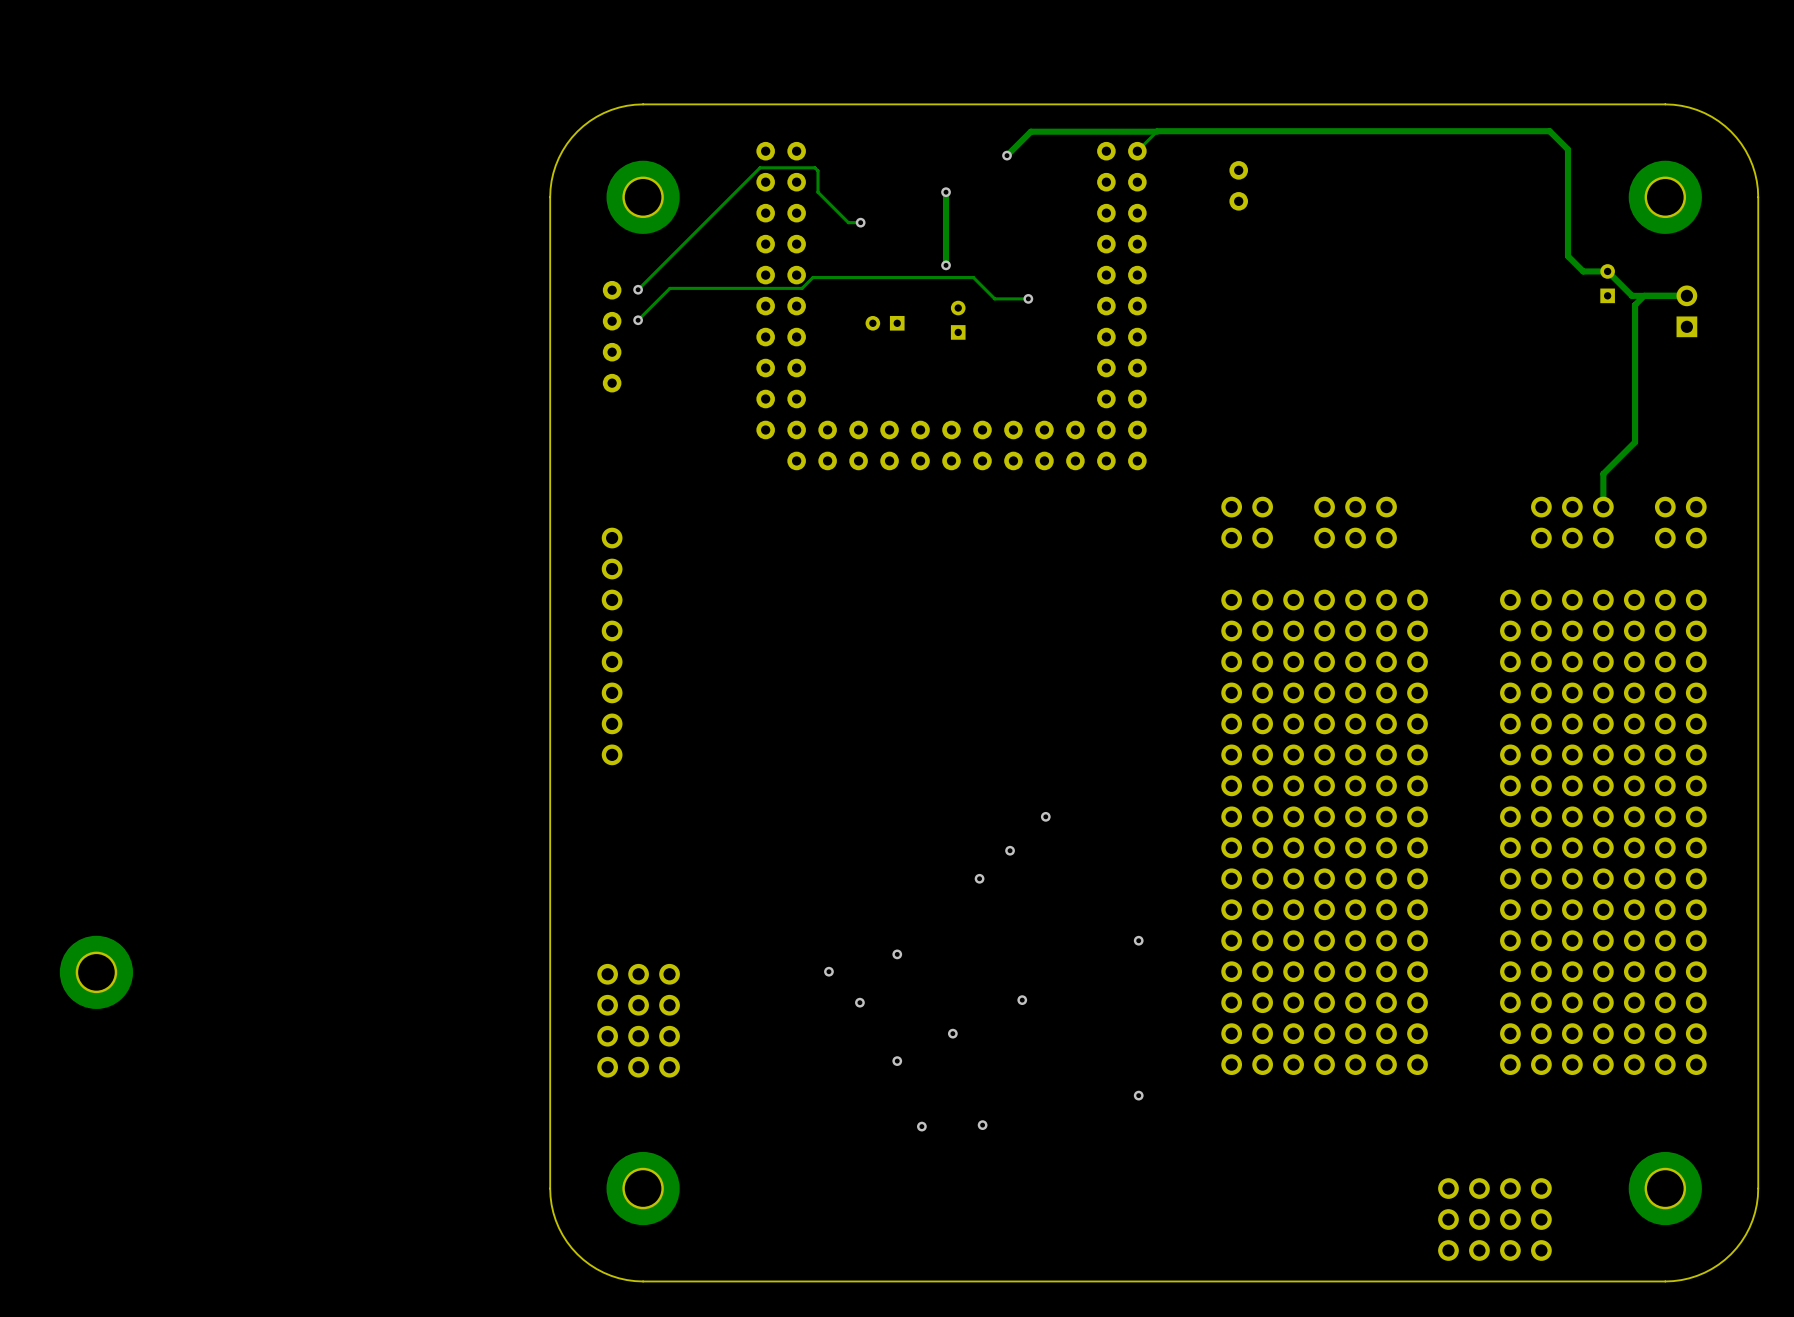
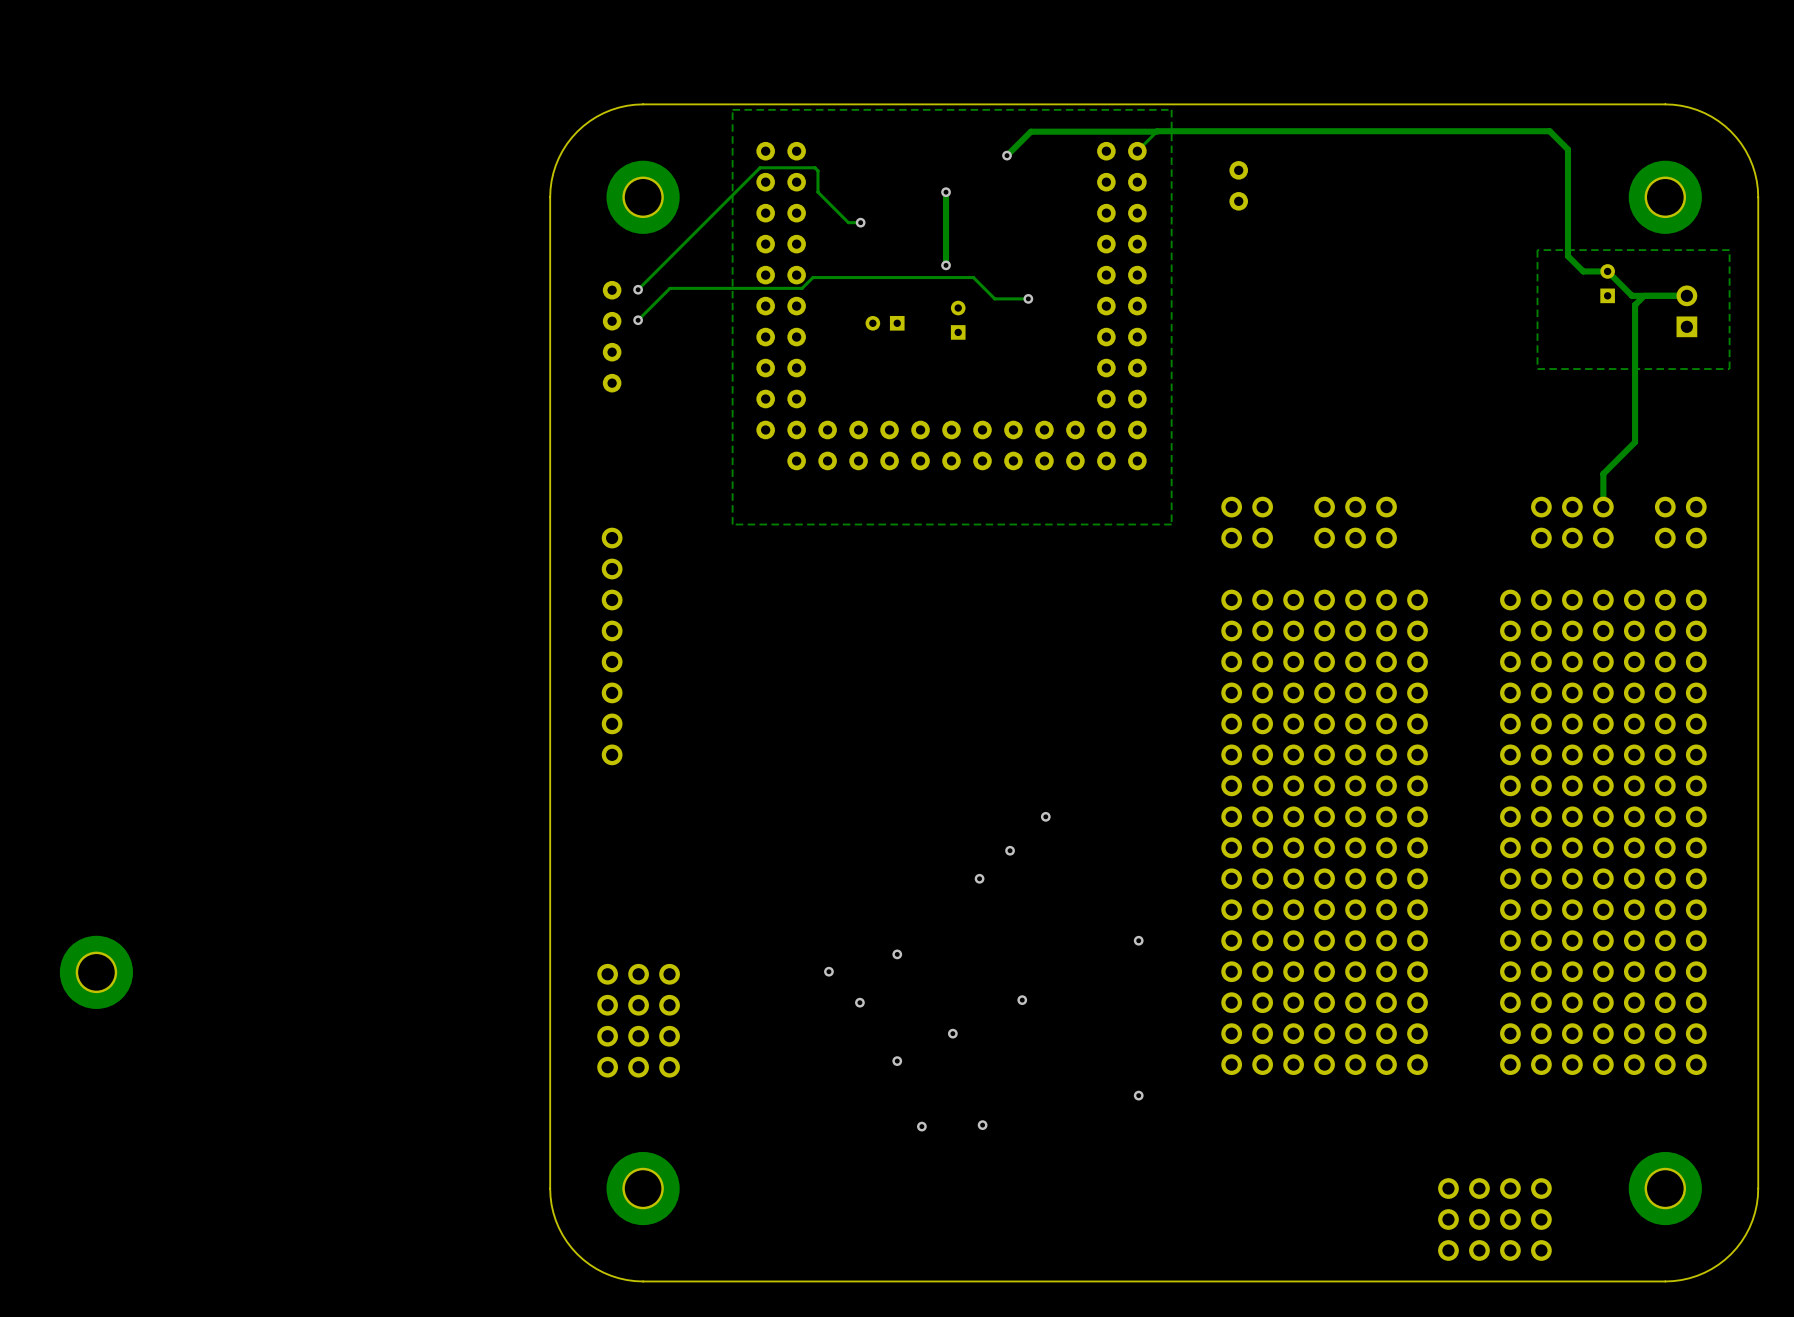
zone outline: none -> (1171, 109) (732, 109) (732, 524) (1171, 524) (1171, 109)
zone outline: none -> (1729, 250) (1729, 369) (1537, 369) (1537, 250) (1729, 250)

